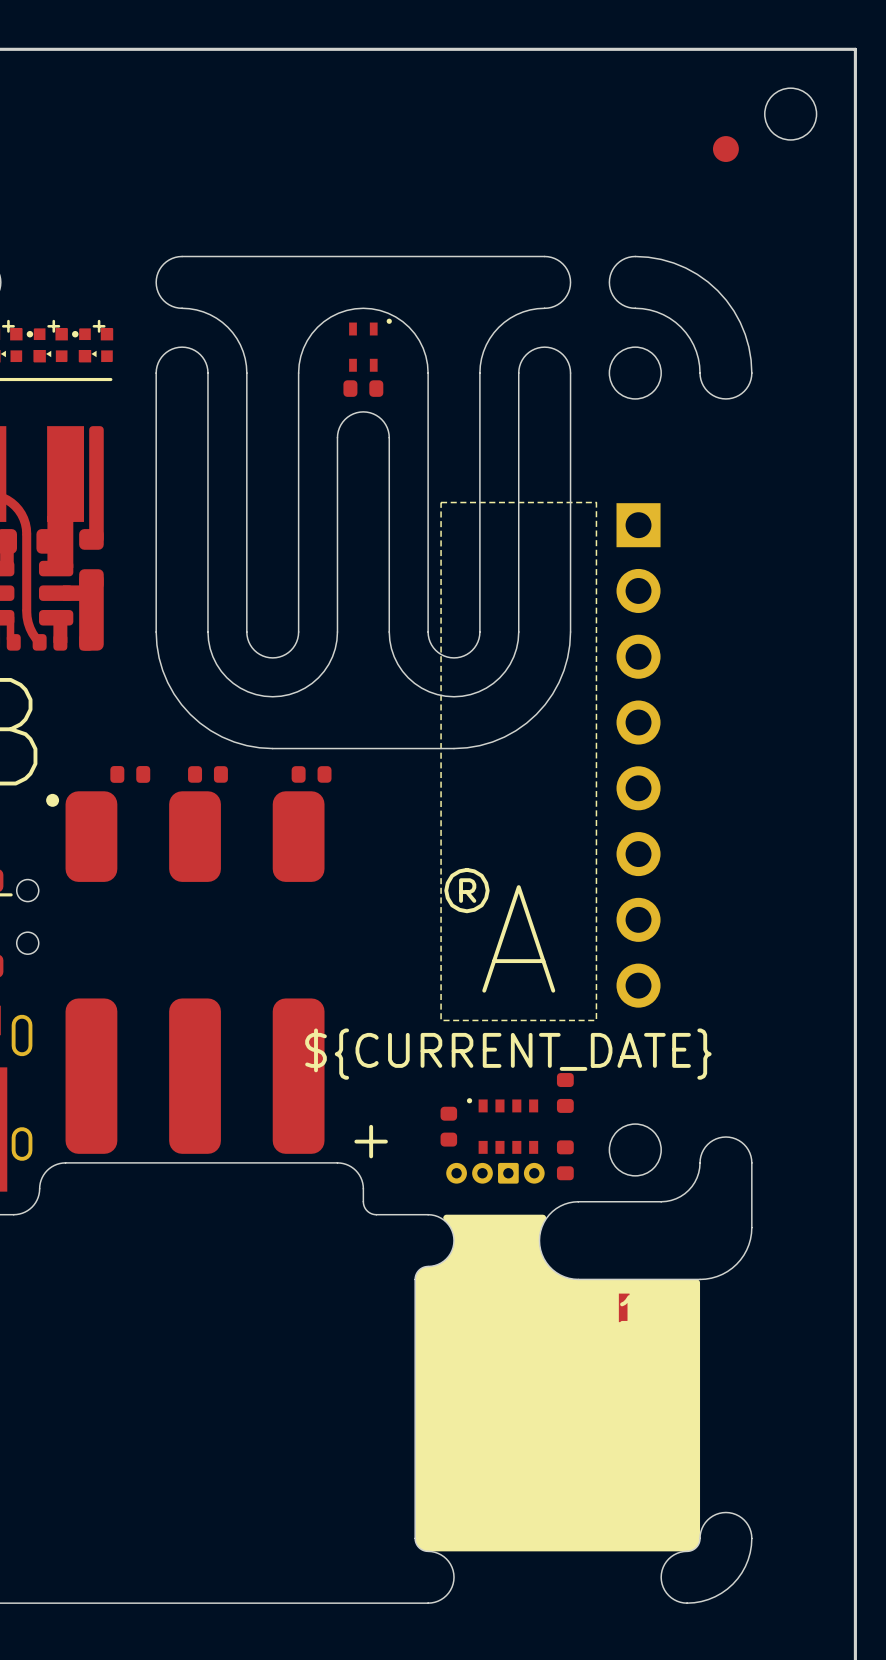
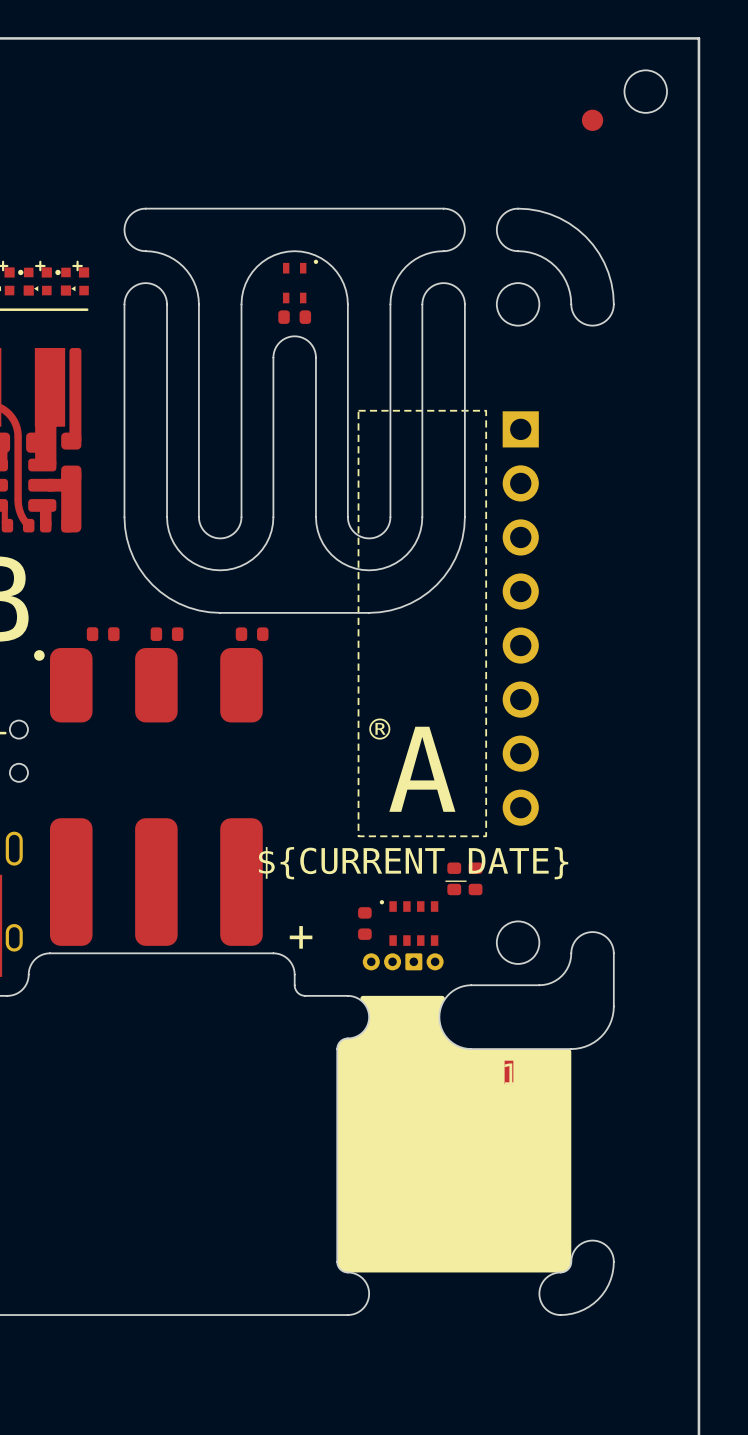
part: none -> (454, 878)
part: none -> (475, 878)
part: (565, 1092) -> none
part: (565, 1160) -> none

